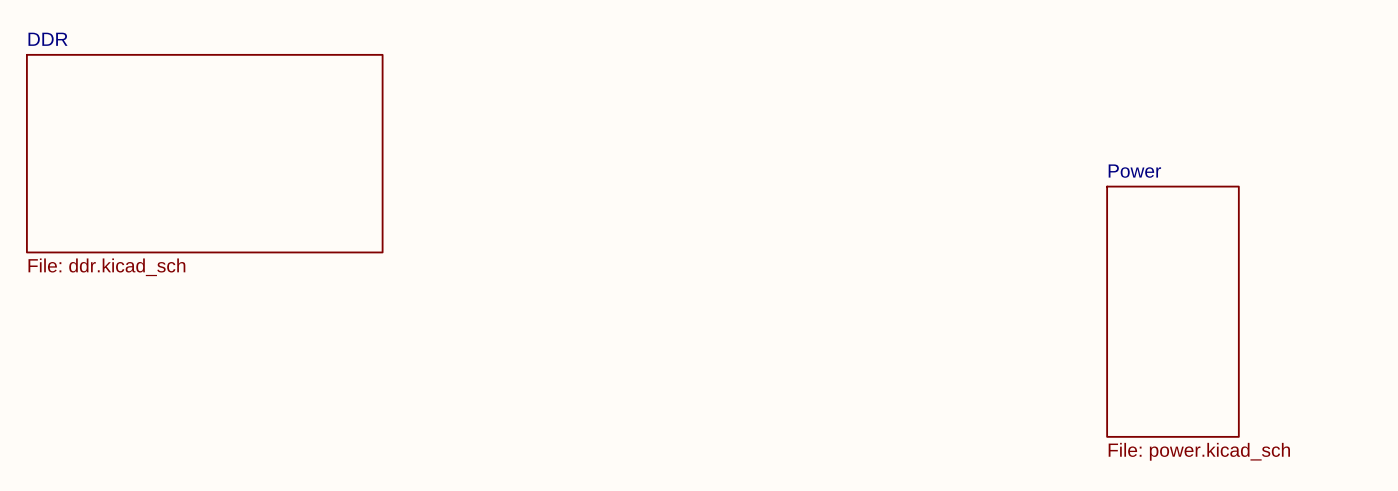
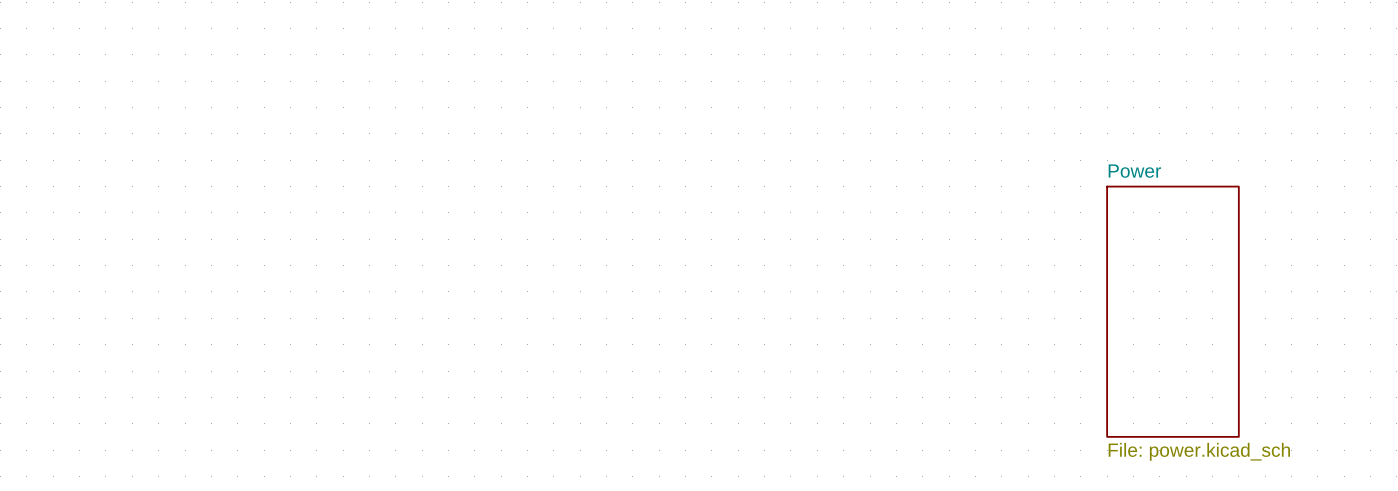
sheet DDR: File: ddr.kicad_sch (204, 153) -> none

